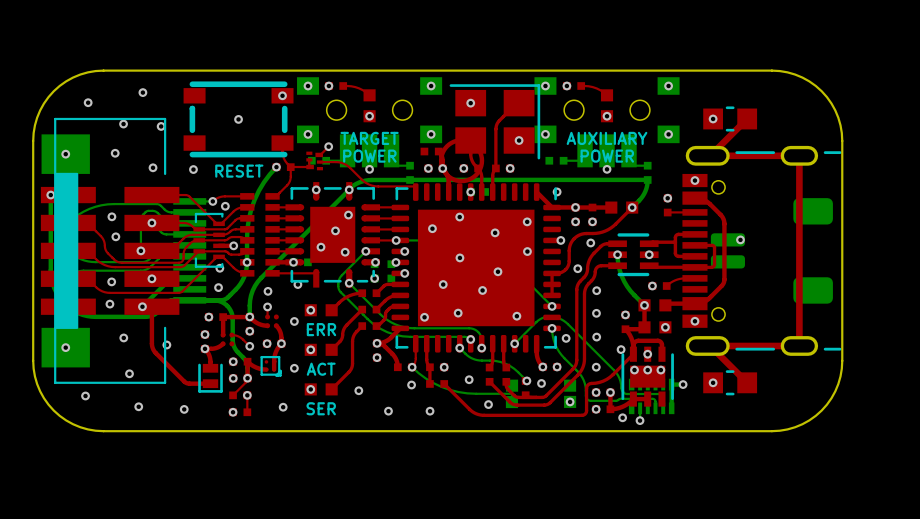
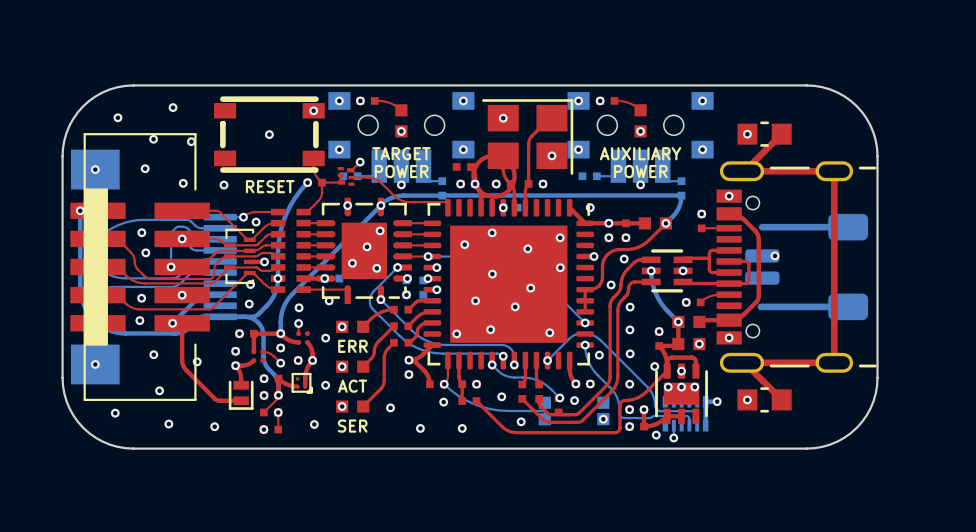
bottom track: none -> (762, 227) (848, 227)
bottom track: none -> (760, 306) (848, 306)

